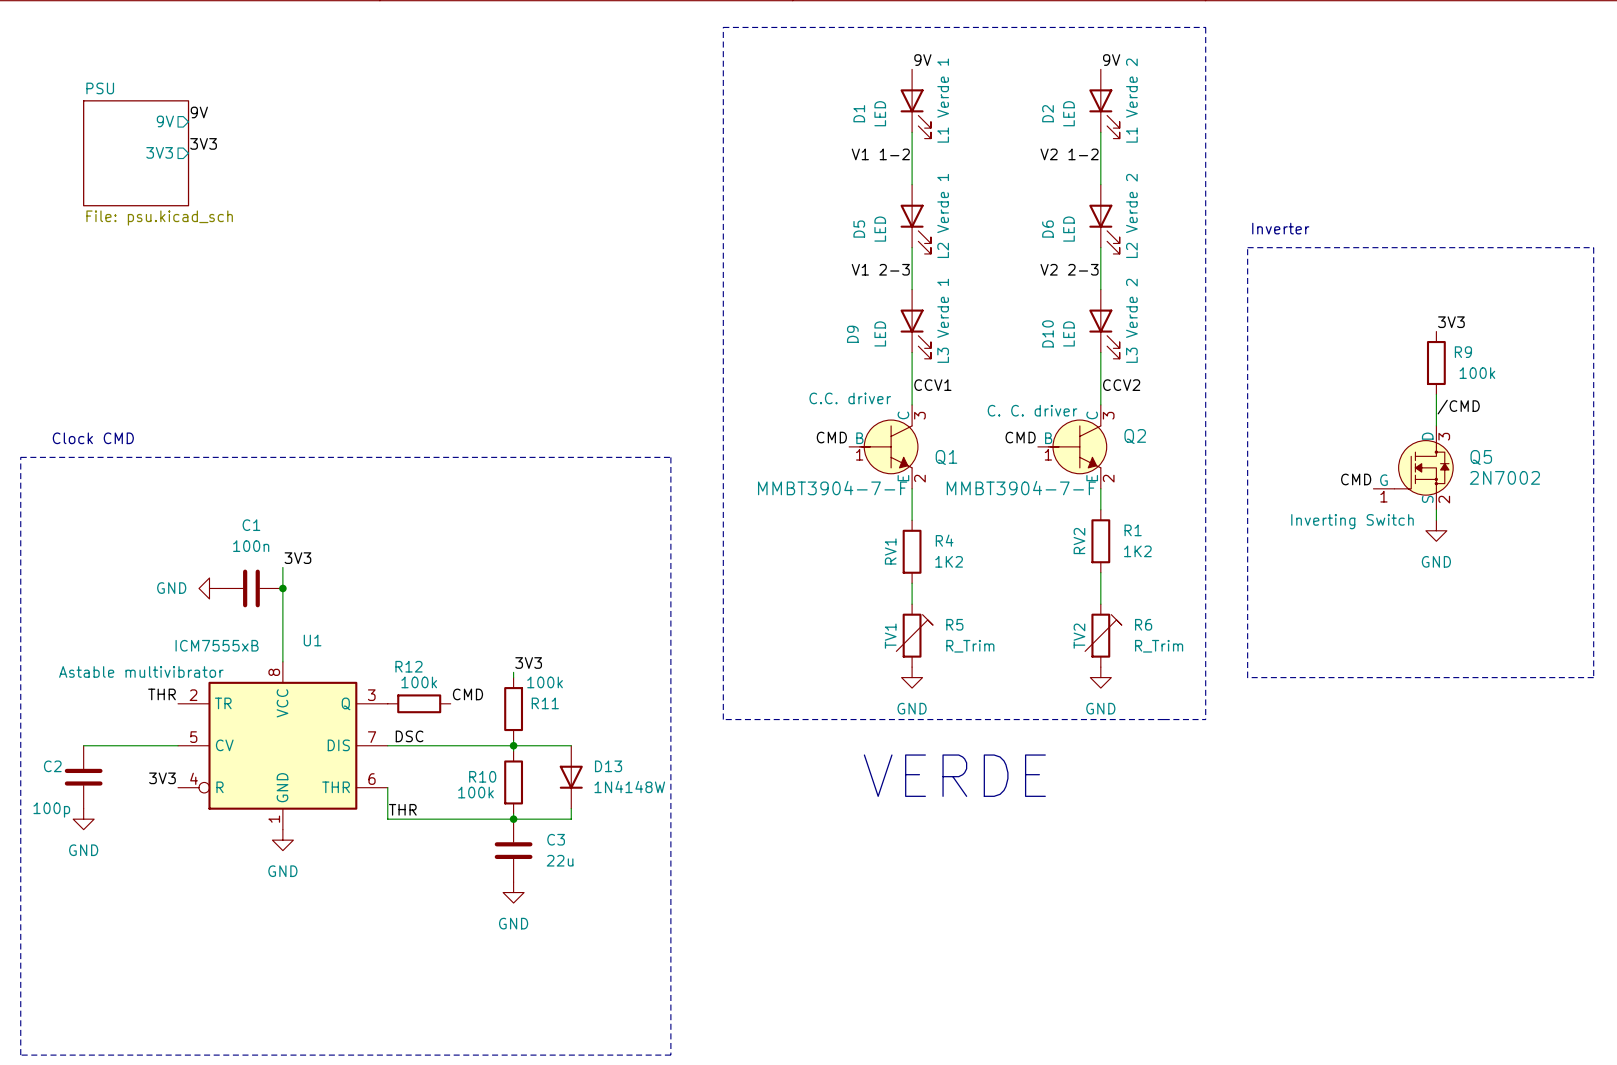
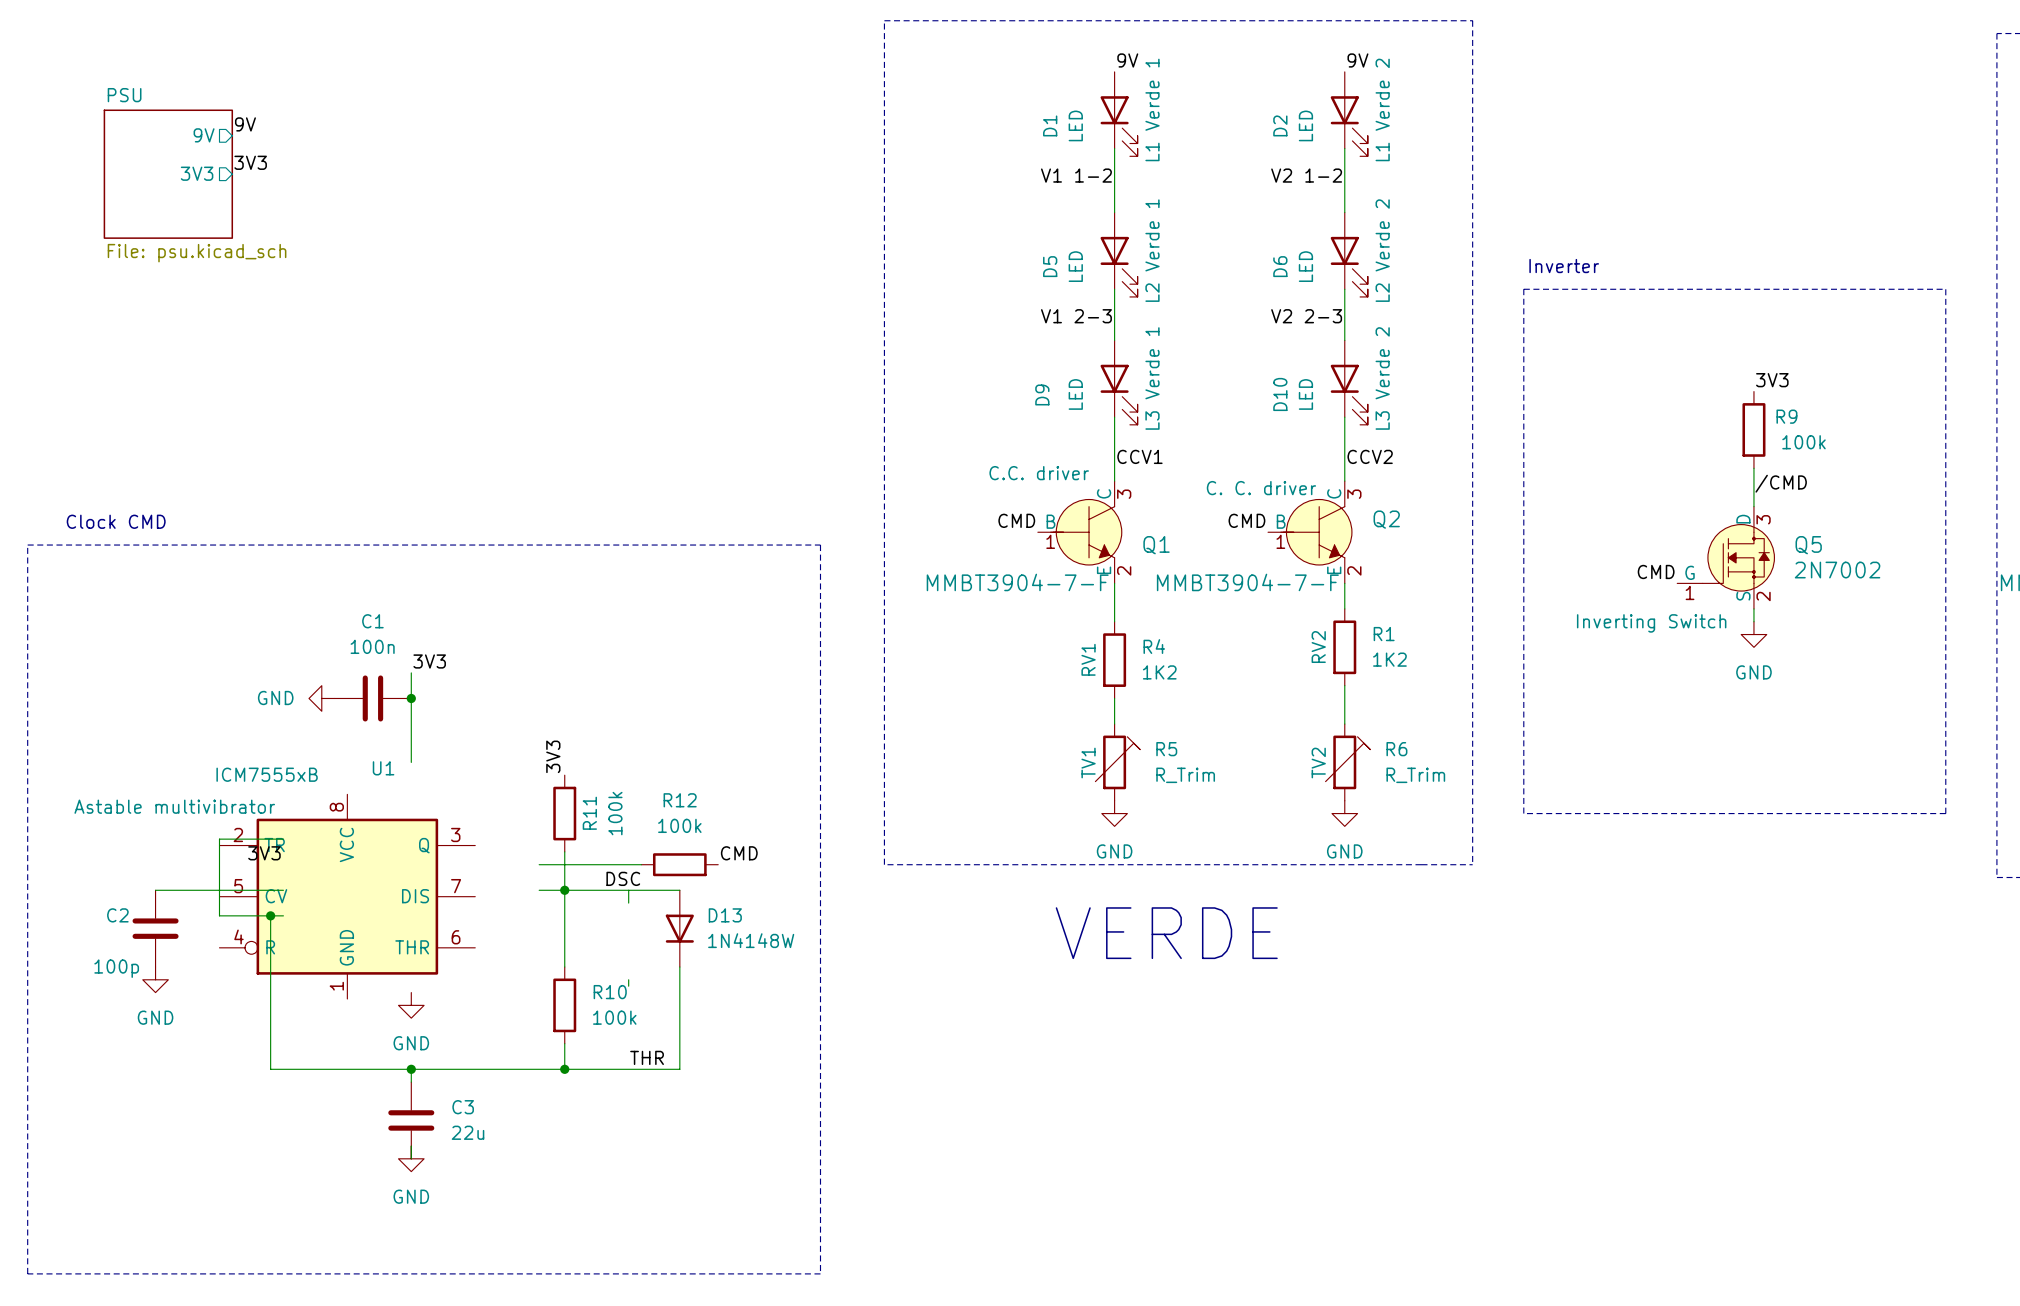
label position: 3V3 (297, 558) -> 3V3 (429, 661)
wire: none -> (411, 672) (411, 762)
wire: (282, 567) (282, 661) -> none
junction: none -> (411, 698)
power symbol position: GND (209, 588) -> GND (321, 698)
C1 position: (251, 588) -> (372, 698)
junction: (282, 588) -> none
label rotation: 0° (528, 662) -> 90° counterclockwise (553, 756)
label position: 3V3 (528, 662) -> 3V3 (553, 756)
R12 name position: R12 (408, 666) -> R12 (680, 800)
wire: (513, 672) (513, 677) -> none
R12 value position: 100k (419, 682) -> 100k (679, 825)
R11 value rotation: 0° (545, 682) -> 90° counterclockwise (615, 813)
label: THR (161, 694) -> none
label position: CMD (467, 694) -> CMD (739, 853)
wire: none -> (283, 839) (219, 839) (219, 915) (283, 915)
R12 position: (419, 703) -> (679, 864)
R11 name rotation: 0° (545, 703) -> 90° counterclockwise (589, 813)
wire: none -> (564, 851) (564, 967)
R11 position: (513, 709) -> (564, 813)
label: none -> 3V3 (264, 853)
wire: none -> (539, 864) (641, 864)
label position: DSC (409, 736) -> DSC (623, 878)
wire: none -> (155, 890) (283, 890)
wire: none -> (539, 890) (679, 890)
junction: none -> (564, 890)
wire: (83, 745) (178, 745) -> none
wire: (387, 745) (571, 745) -> none
junction: (513, 745) -> none
wire: none -> (270, 915) (270, 1069) (679, 1069) (679, 967)
junction: none -> (270, 915)
R10 name position: R10 (482, 776) -> R10 (610, 992)
C2 position: (83, 777) -> (155, 928)
D13 position: (571, 777) -> (679, 928)
label: 3V3 (162, 778) -> none
R10 position: (513, 782) -> (564, 1005)
wire: (387, 787) (387, 819) (571, 819) (571, 808) -> none
R10 value position: 100k (475, 792) -> 100k (614, 1017)
label position: THR (402, 809) -> THR (647, 1057)
power symbol position: GND (83, 819) -> GND (155, 979)
junction: (513, 819) -> none
power symbol position: GND (282, 840) -> GND (411, 1005)
C3 position: (513, 850) -> (411, 1120)
wire: none -> (564, 1043) (564, 1069)
wire: none -> (411, 1069) (411, 1082)
junction: none -> (411, 1069)
junction: none -> (564, 1069)
power symbol: GND (513, 892) -> none
wire: none -> (411, 1146) (411, 1158)
power symbol: none -> GND (411, 1158)

